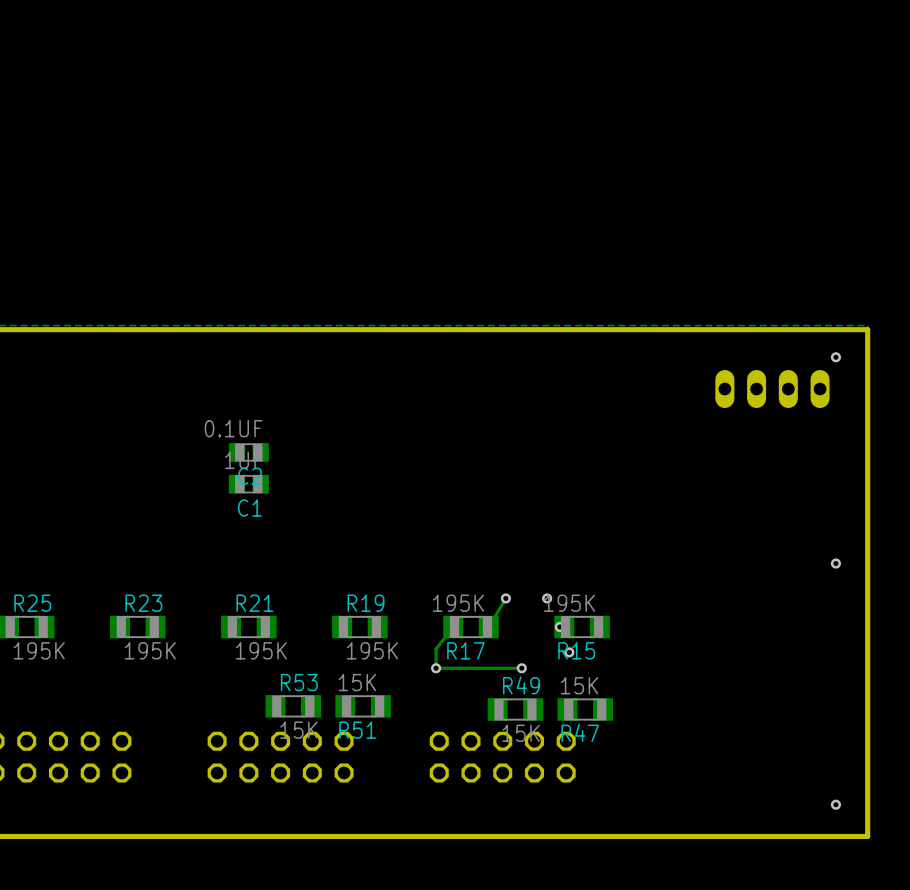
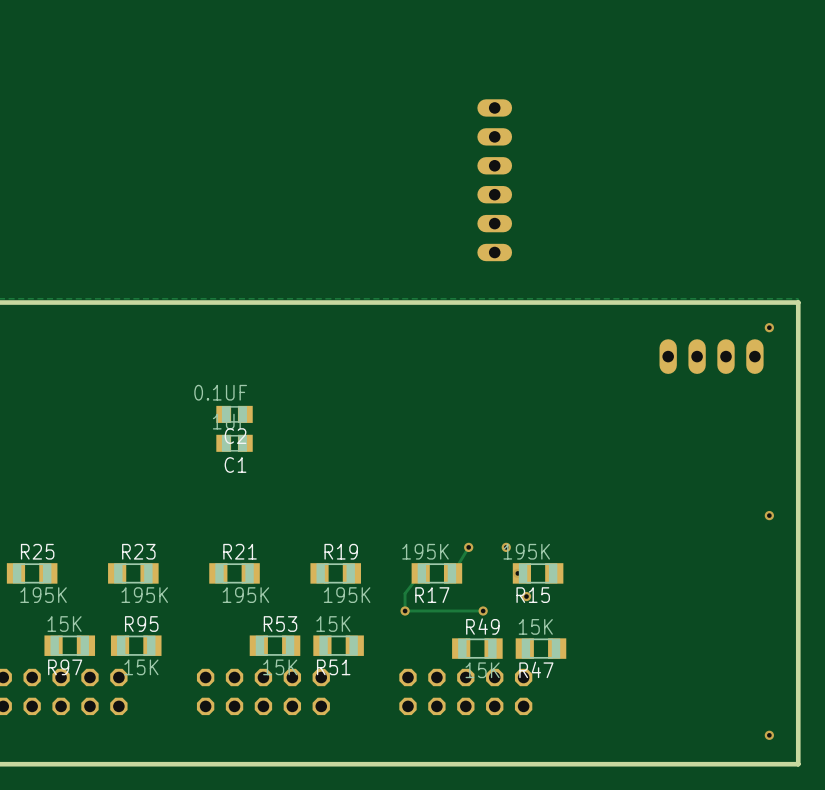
part: none -> (494, 180)
R97: none -> 15K (69, 645)
R95: none -> 15K (136, 645)

